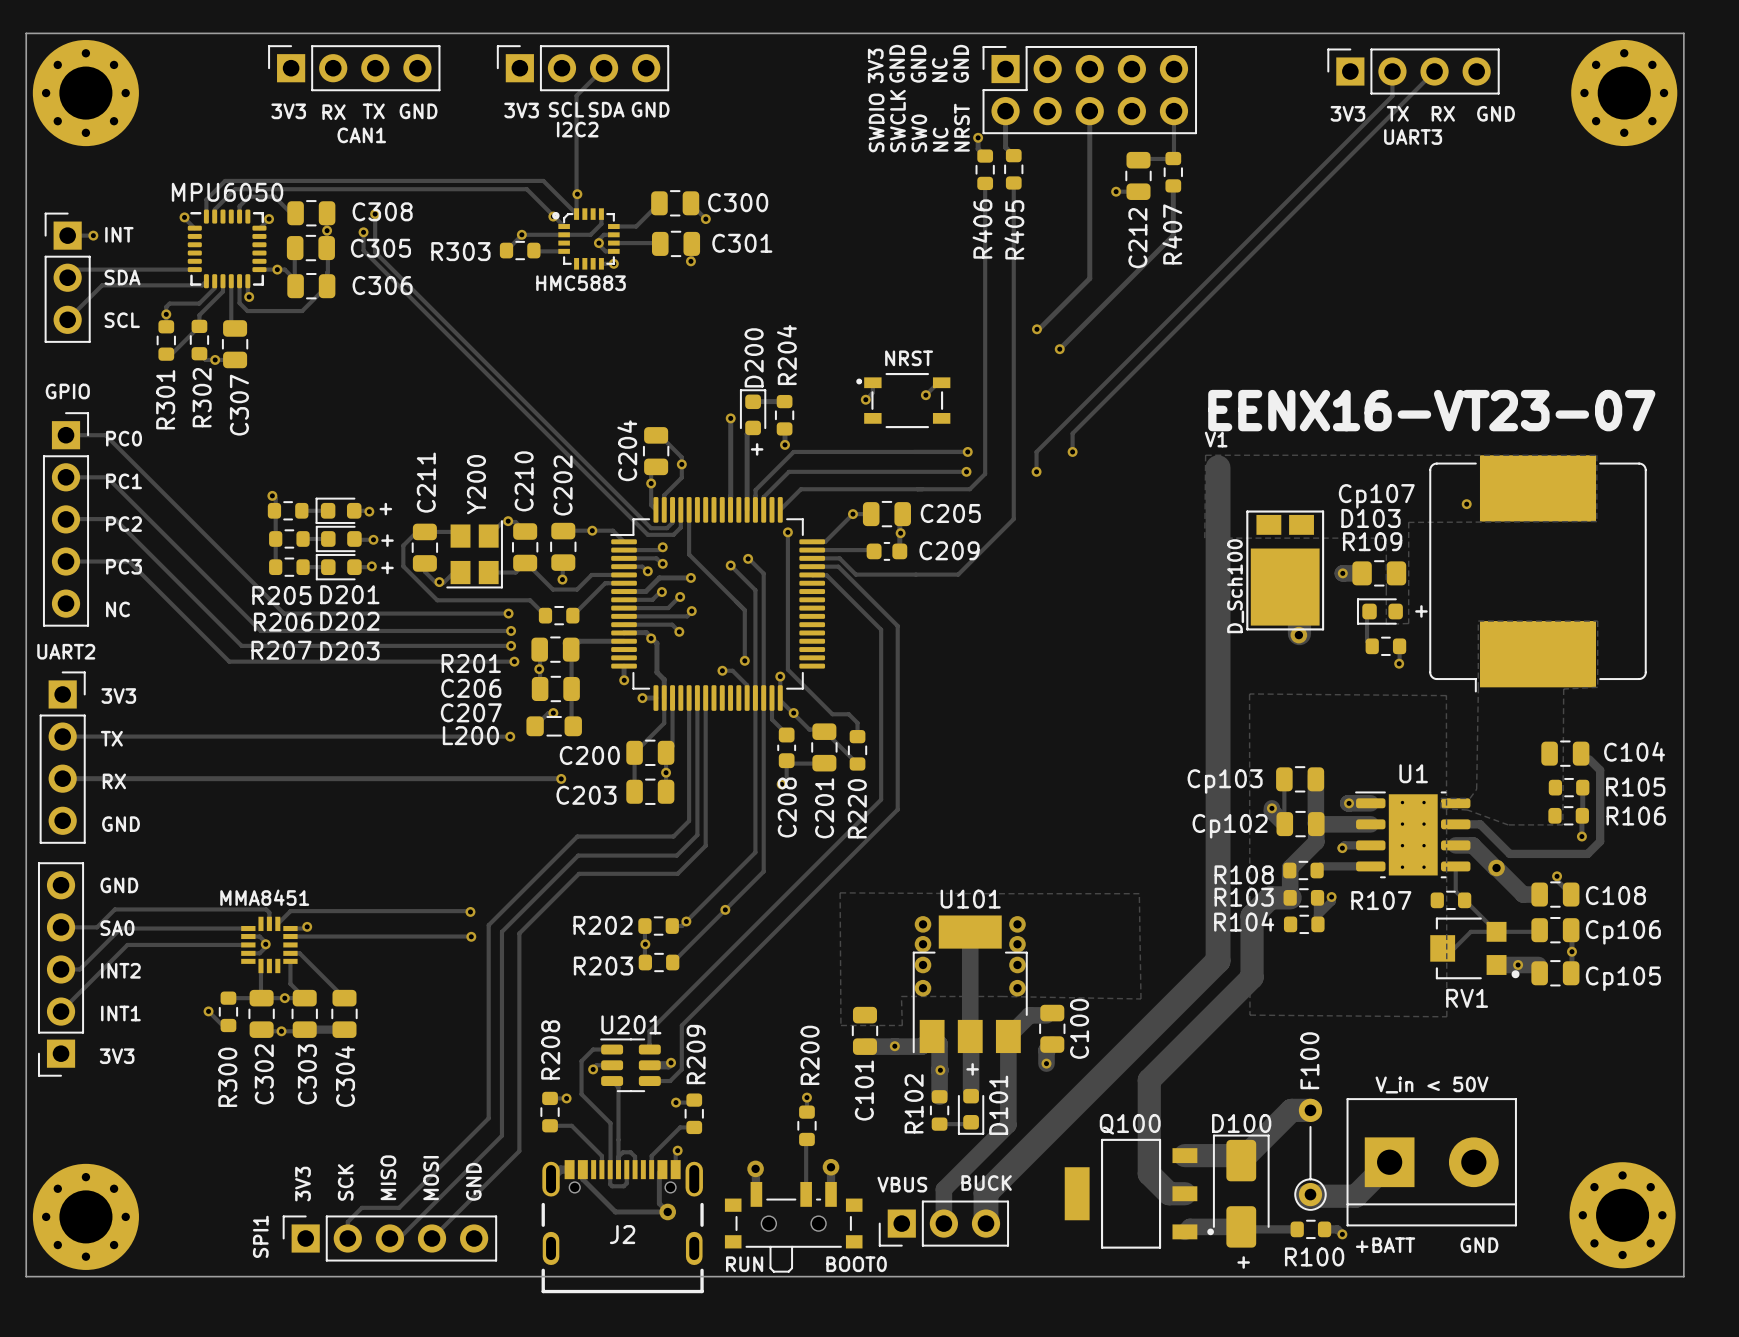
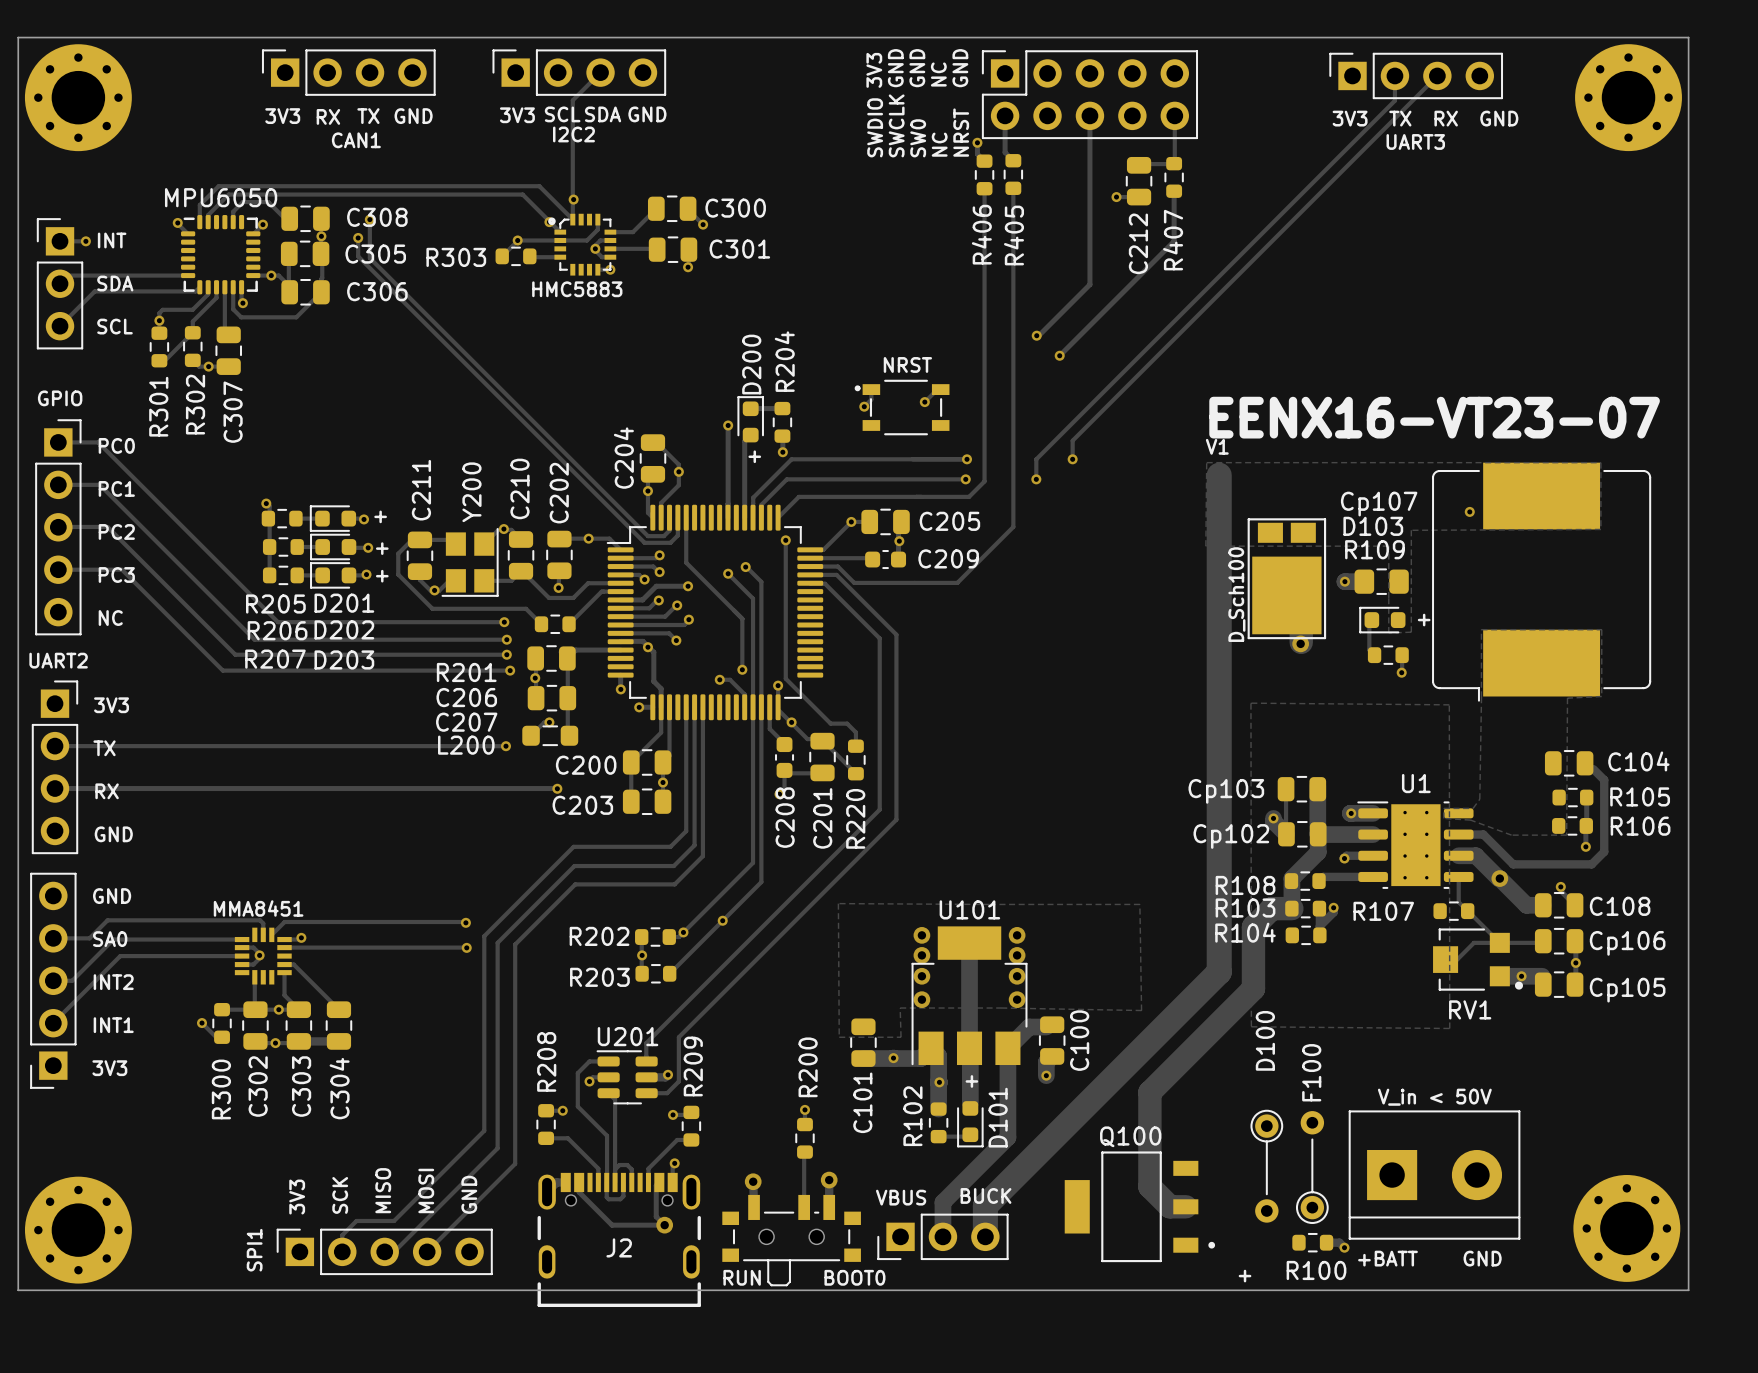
track: (1310, 1110) (1291, 1110) (1241, 1160) (1236, 1155) (1184, 1155) -> none
D100 name position: D100 (1241, 1123) -> D100 (1265, 1040)
D100 footprint: [1212, 1134, 1270, 1248] -> [1250, 1109, 1284, 1223]
track: (1389, 1162) (1355, 1196) (1306, 1196) -> none
track: (1297, 1229) (1189, 1226) (1184, 1231) -> none

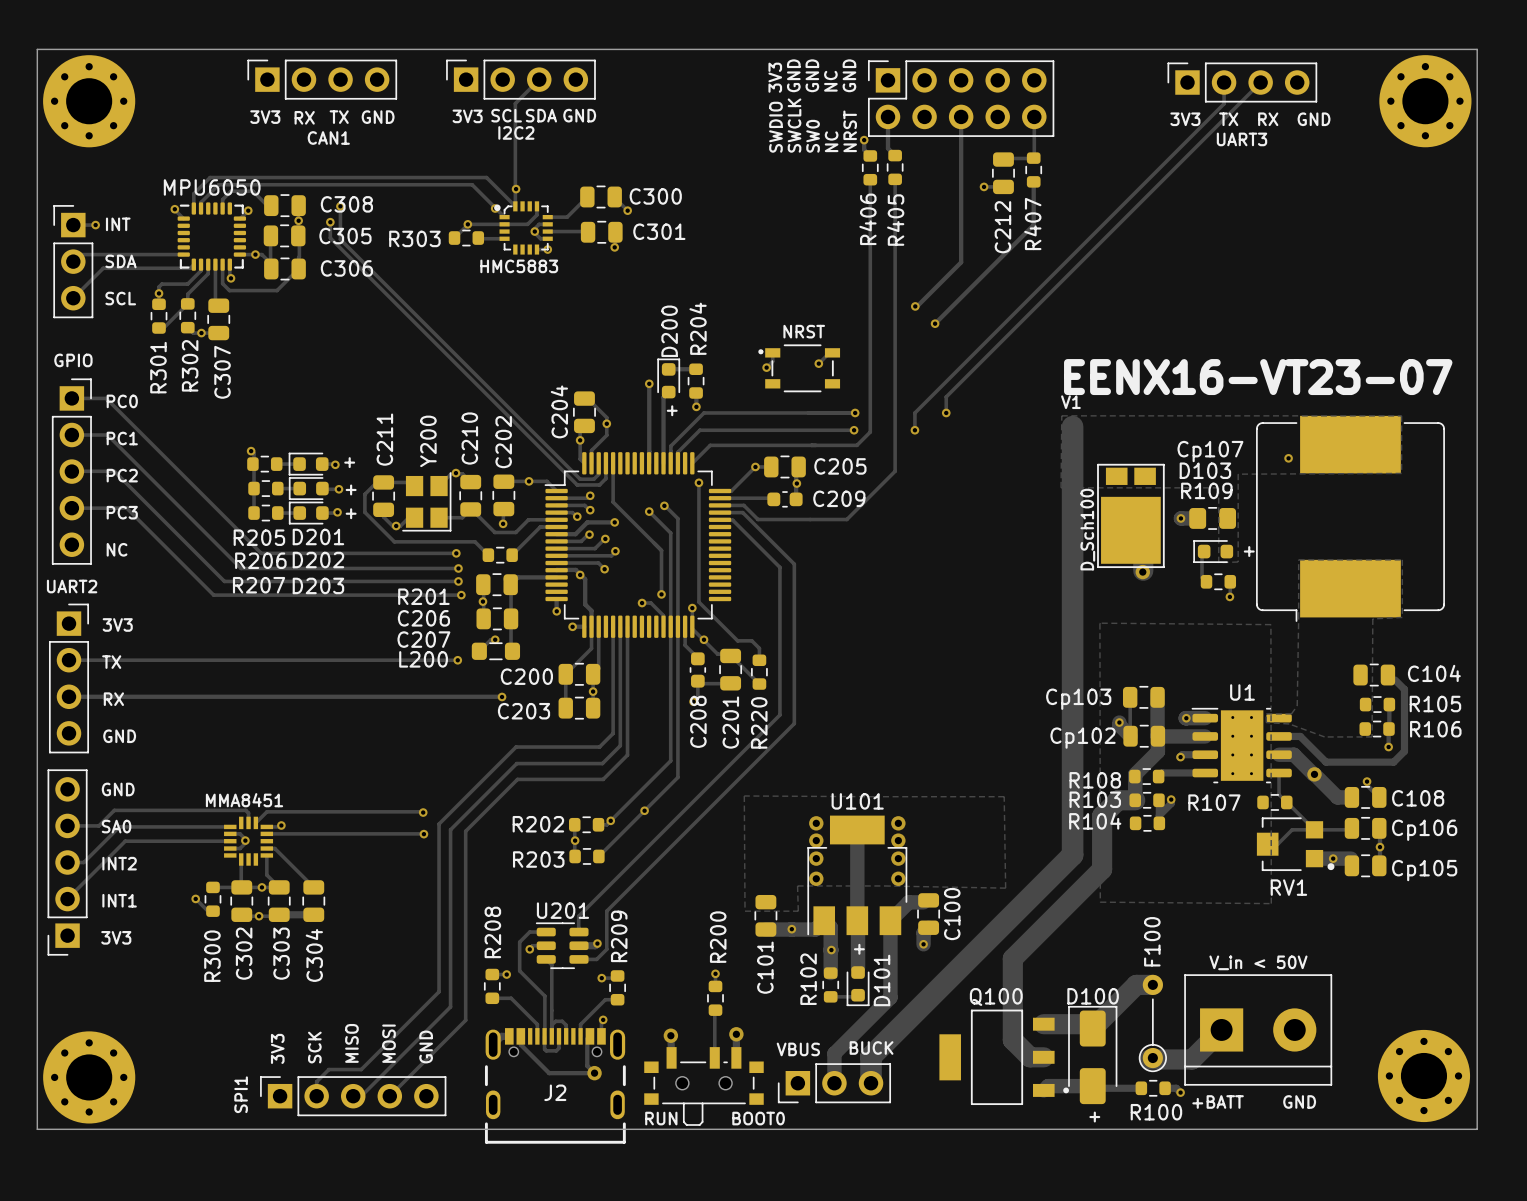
D100 name position: D100 (1265, 1040) -> D100 (1093, 996)
D100 footprint: [1250, 1109, 1284, 1223] -> [1068, 1005, 1118, 1105]
track: none -> (1152, 984) (1136, 984) (1092, 1028) (1088, 1024) (1043, 1024)
track: none -> (1221, 1029) (1192, 1059) (1149, 1059)
track: none -> (1141, 1088) (1048, 1086) (1043, 1090)

